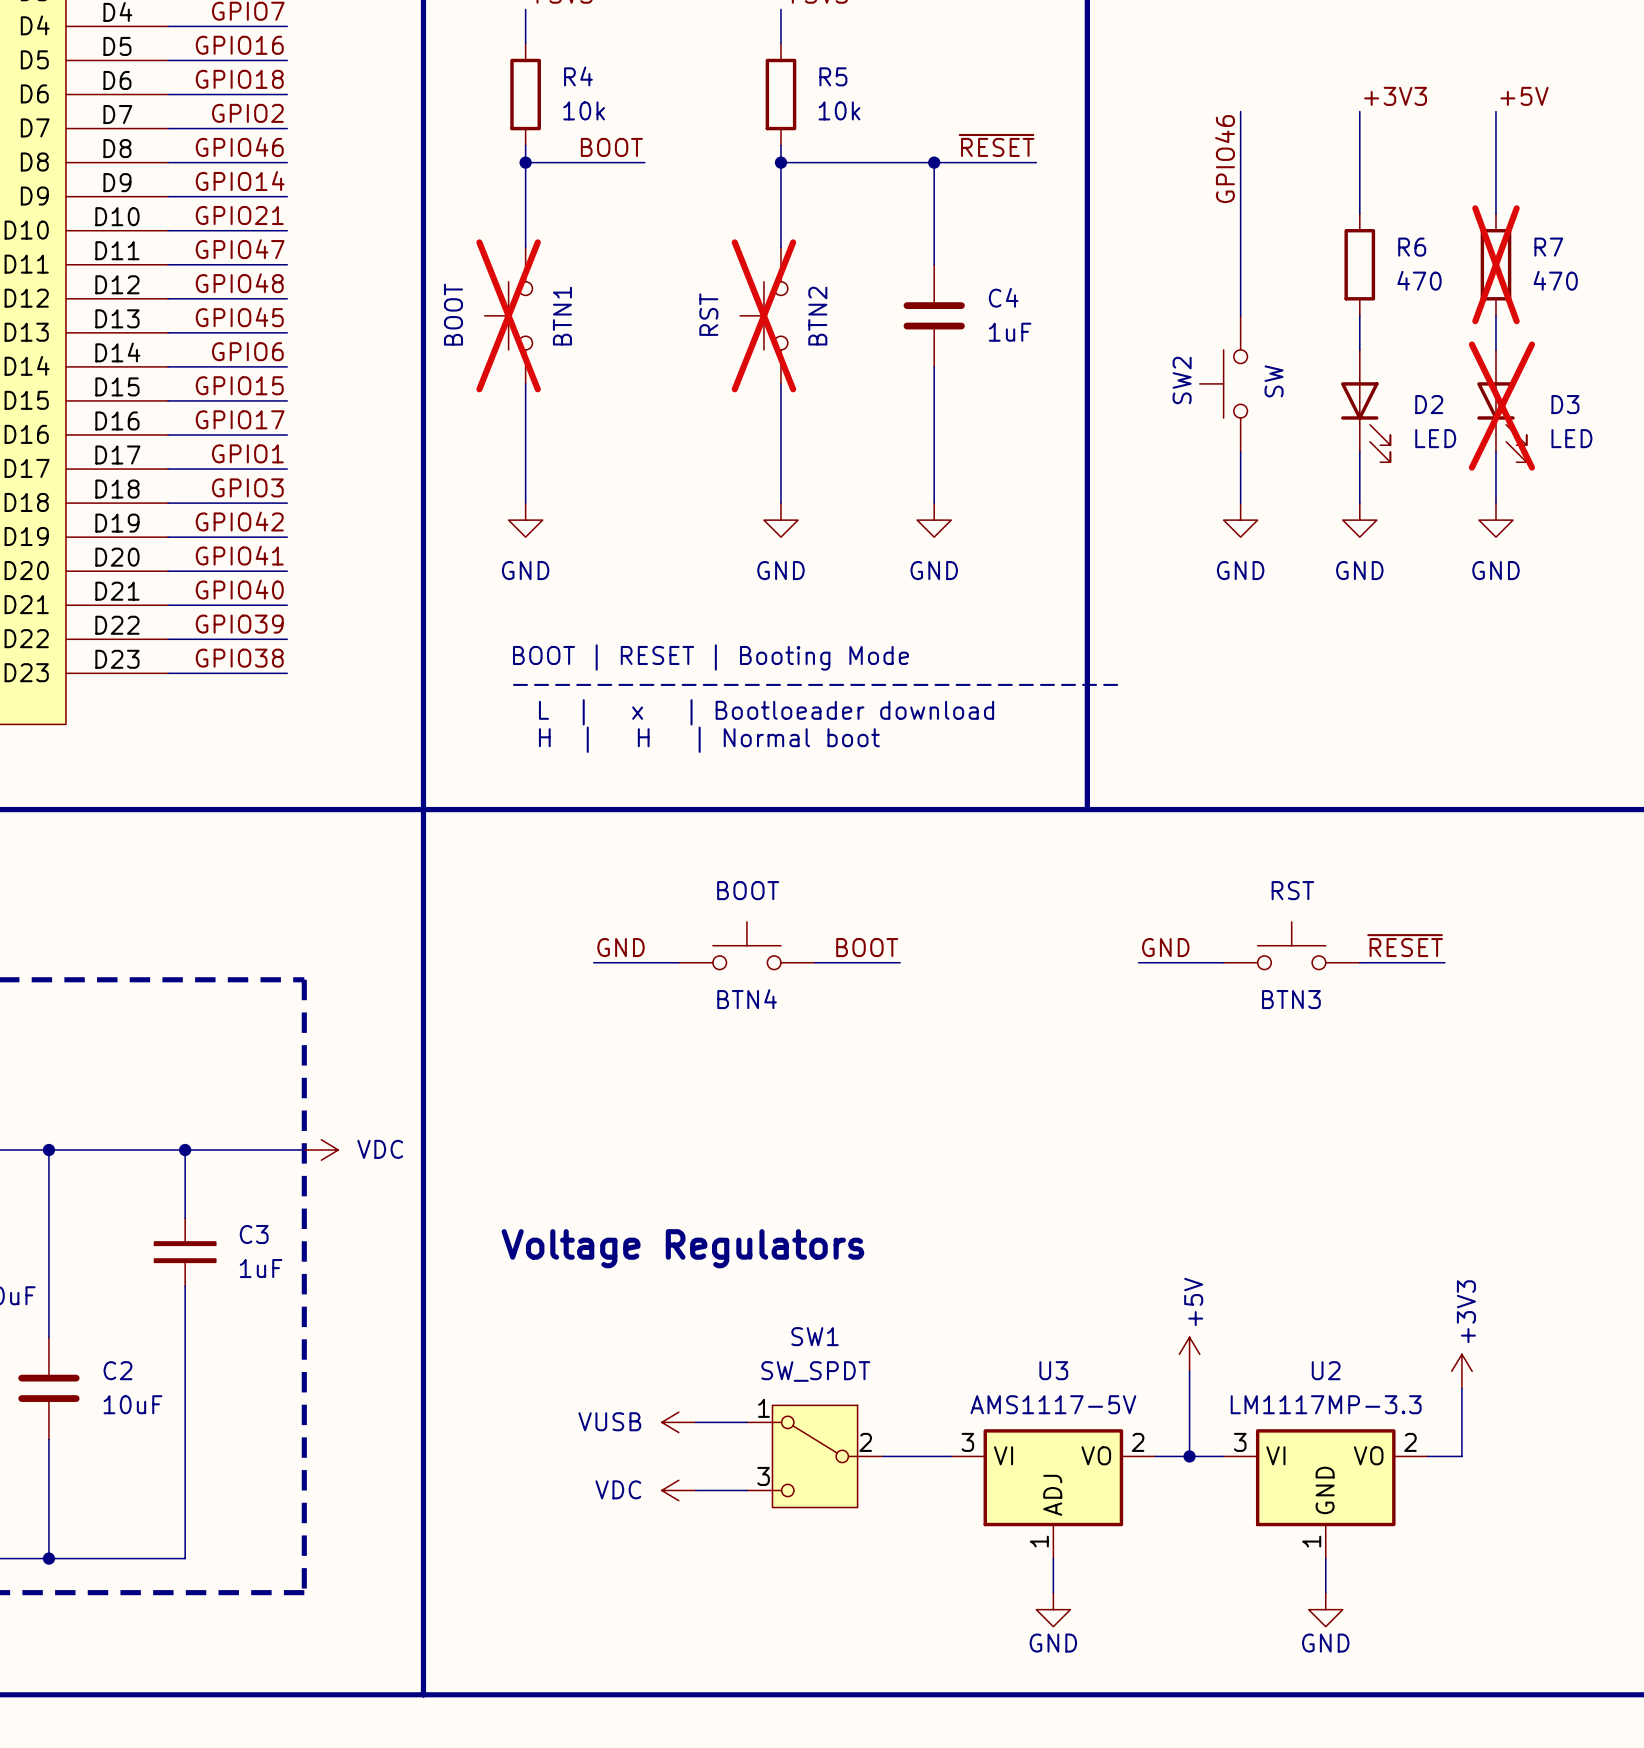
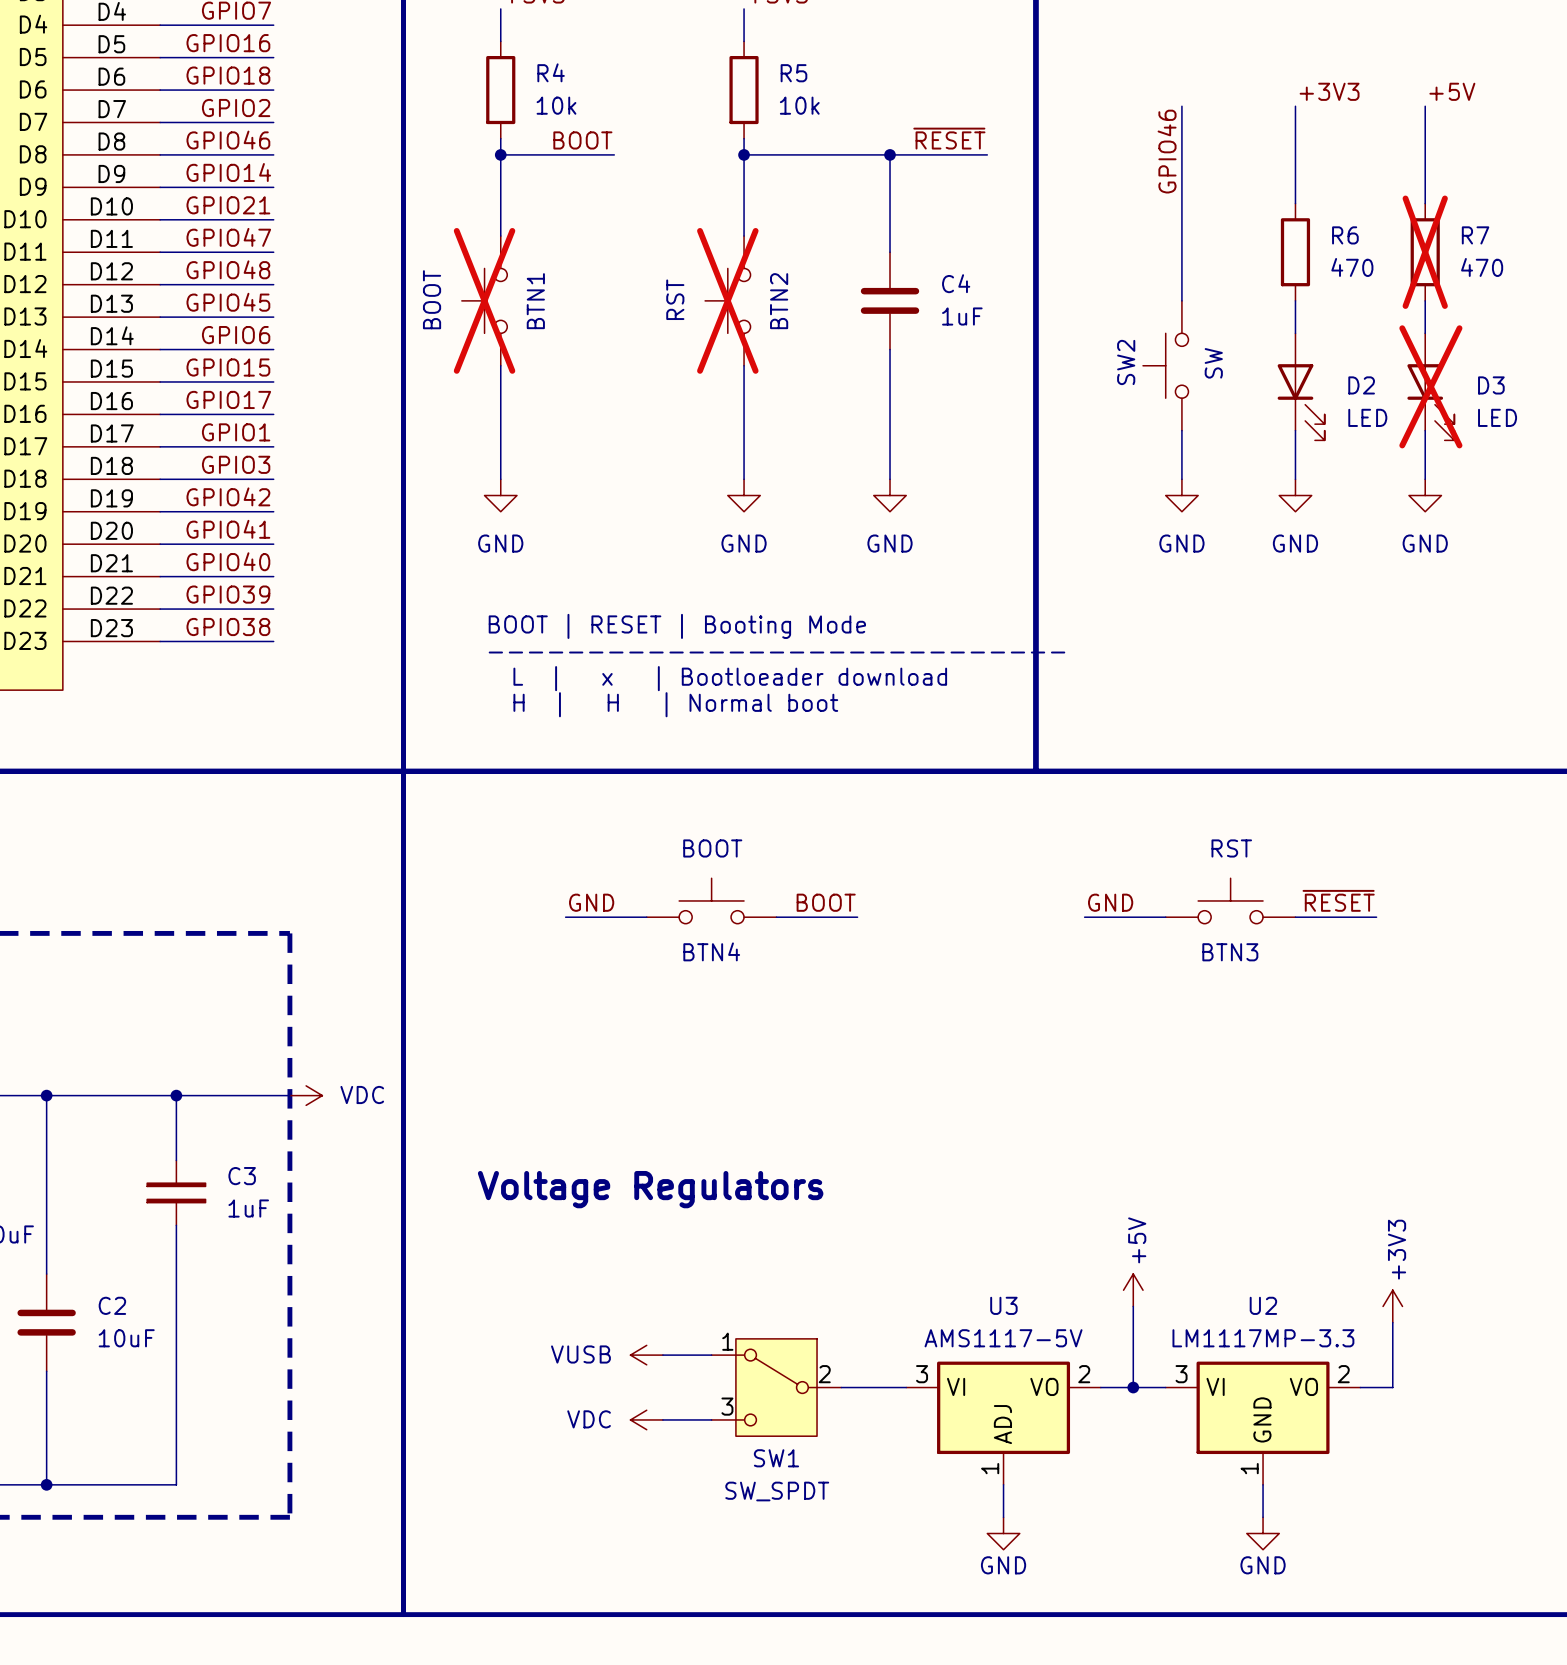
SW1 name position: SW1 (815, 1336) -> SW1 (776, 1458)
SW1 value position: SW_SPDT (815, 1371) -> SW_SPDT (777, 1491)

